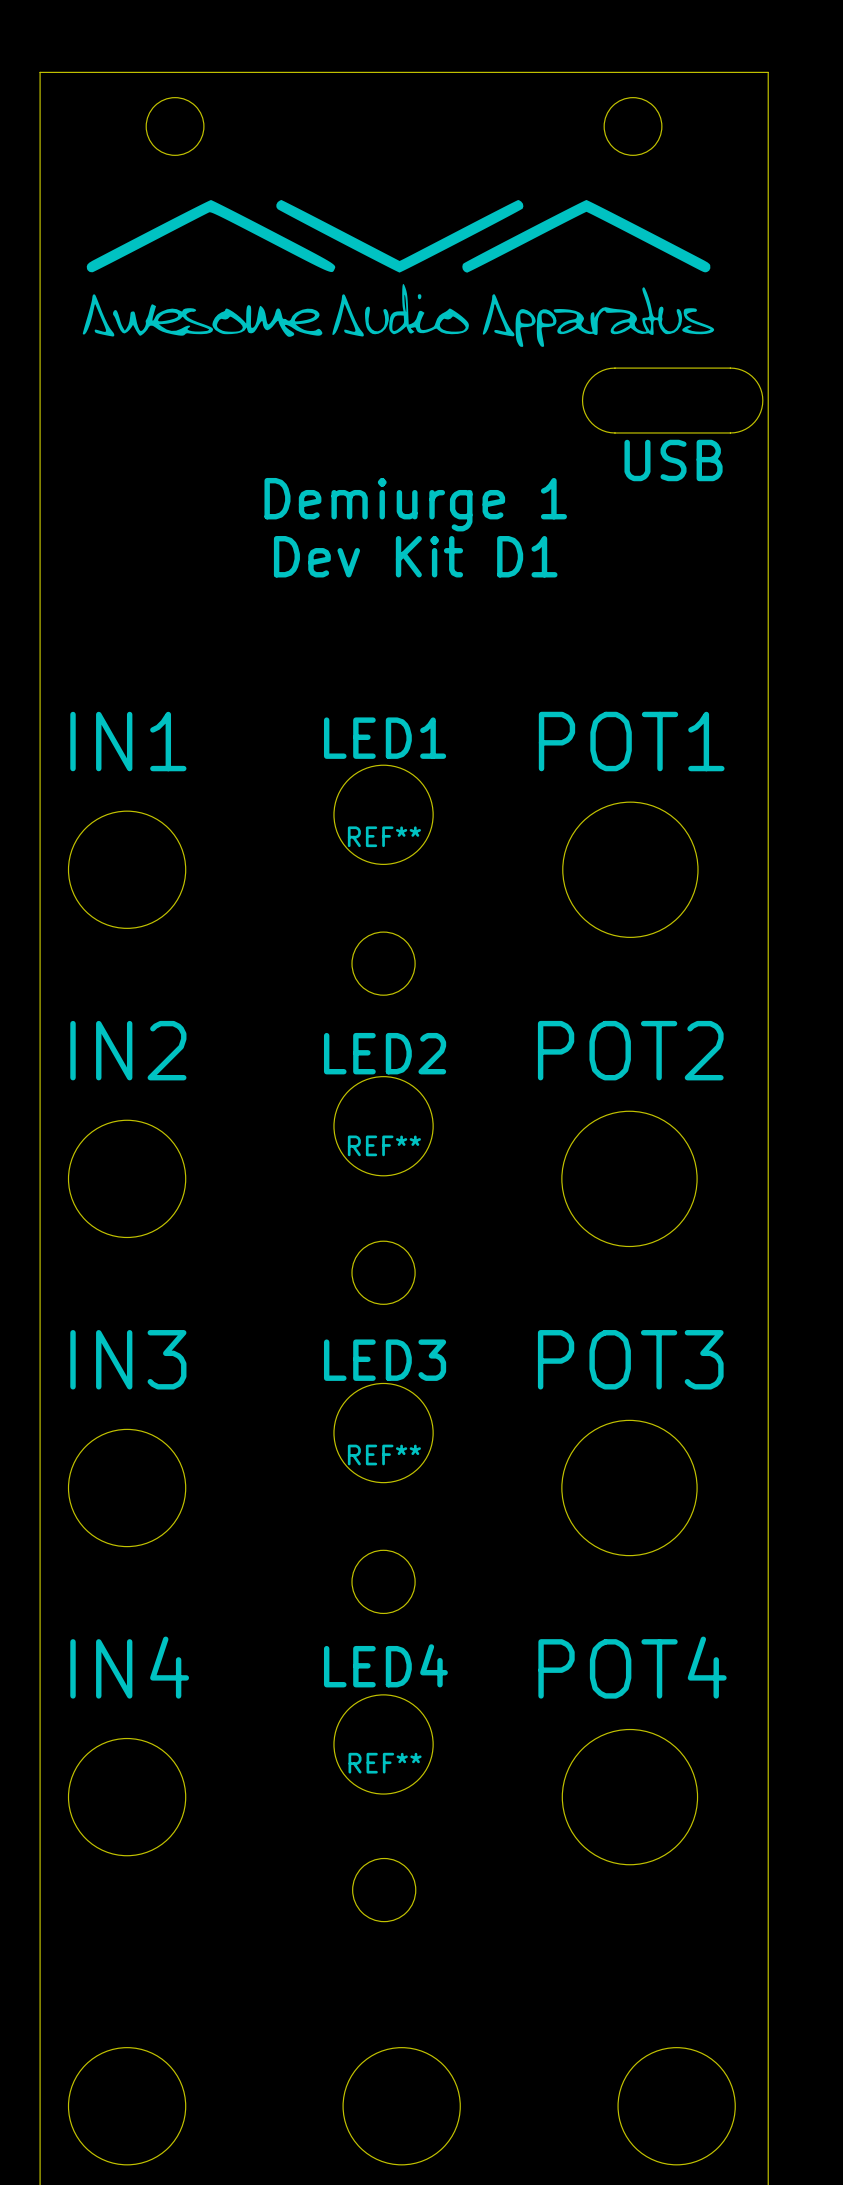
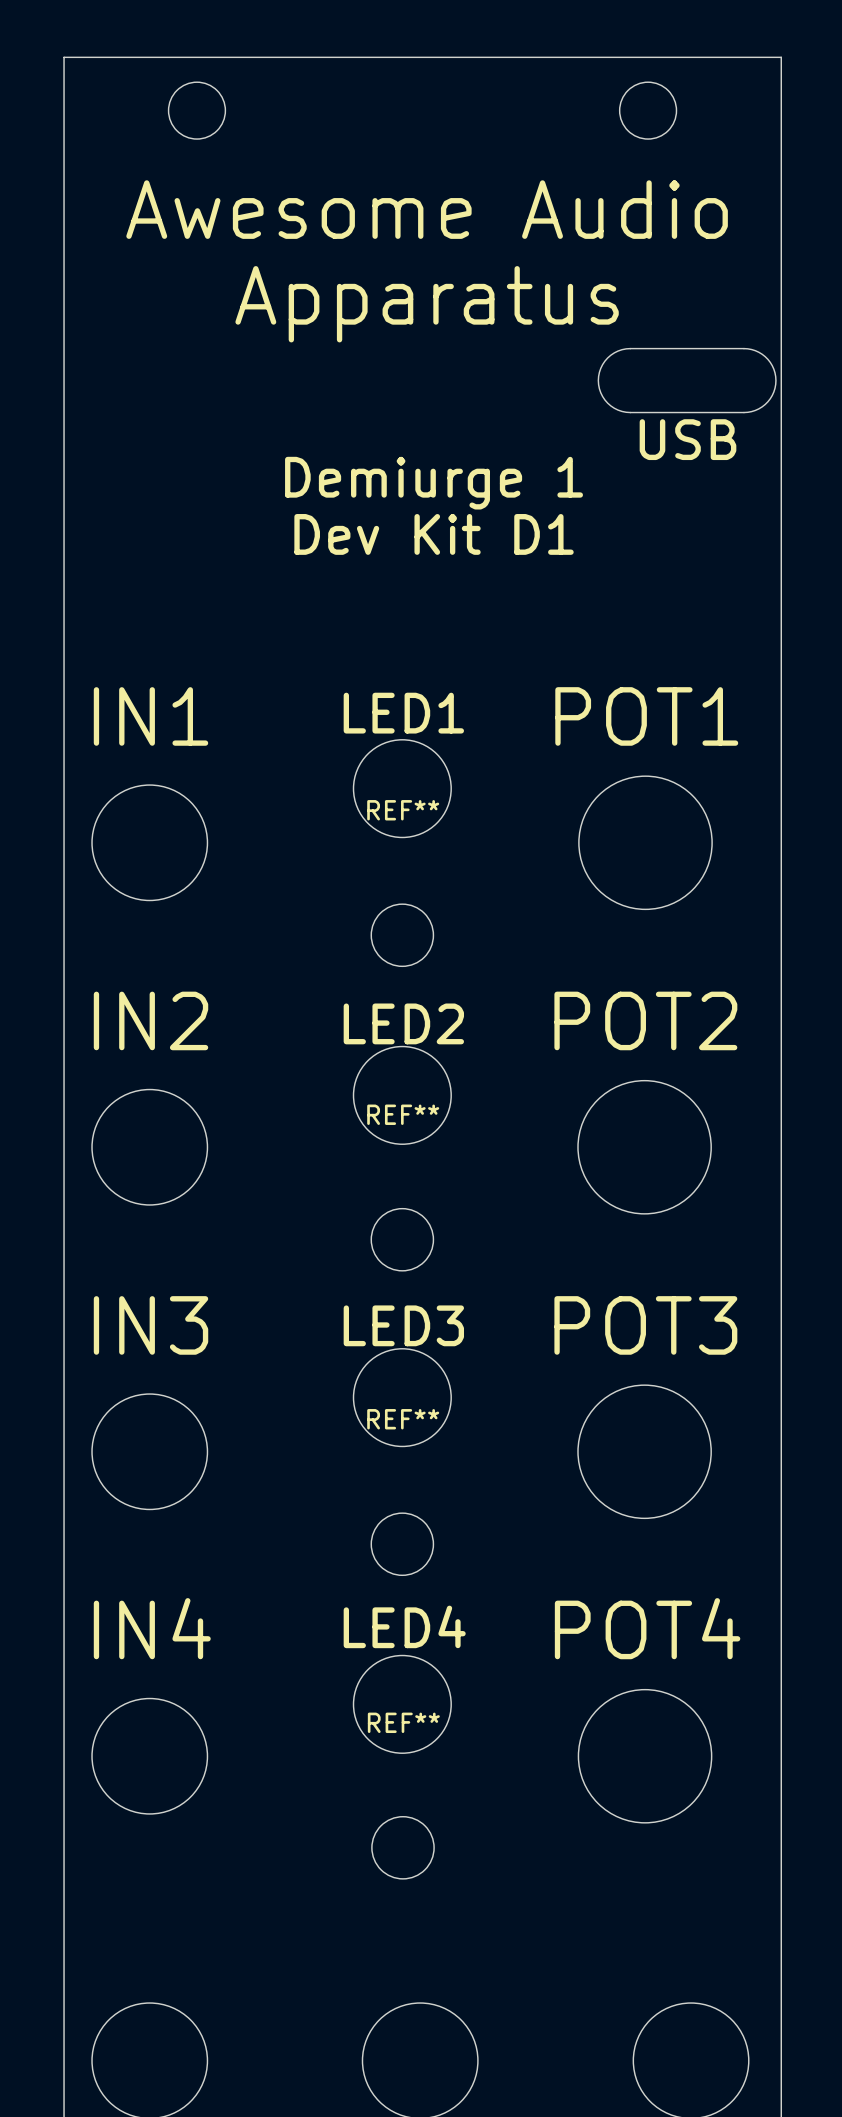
drawing: [82, 199, 715, 347] -> none
text: none -> Awesome Audio (427, 209)
text: none -> Apparatus (427, 304)

